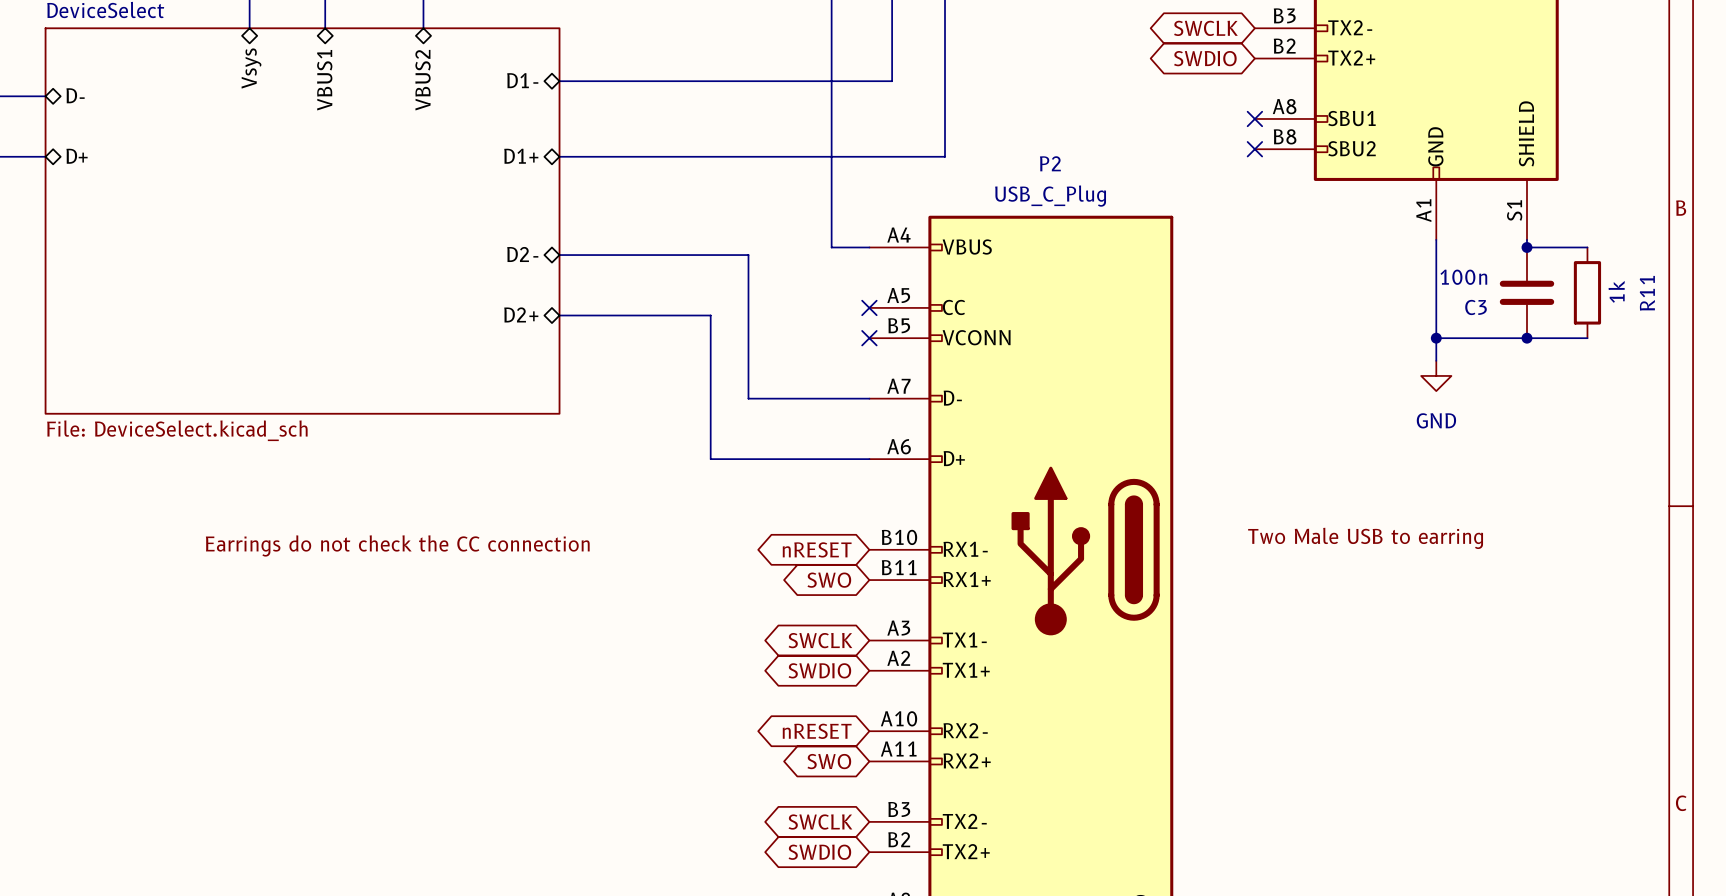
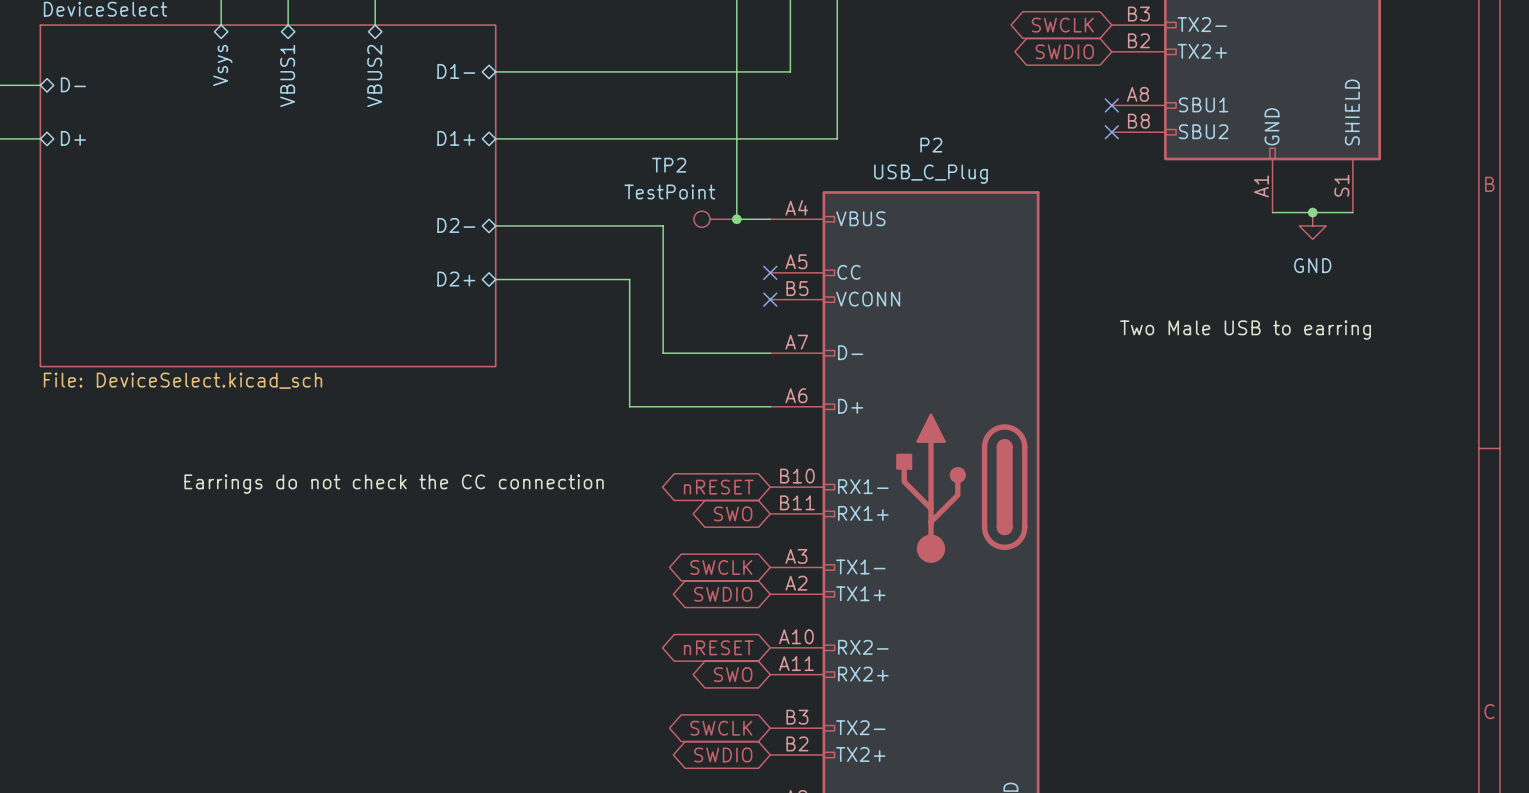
wire: (1436, 239) (1436, 360) -> (1272, 212) (1352, 212)
wire: (1527, 239) (1527, 247) (1587, 247) -> none
TP2: none -> TestPoint (715, 219)
junction: none -> (736, 219)
junction position: (1527, 247) -> (1312, 212)
C3: 100n (1527, 292) -> none
R11: 1k (1587, 292) -> none
wire: (1436, 338) (1587, 338) -> none
junction: (1436, 338) -> none
junction: (1527, 338) -> none
power symbol position: GND (1436, 375) -> GND (1312, 225)
label position: Two Male USB to earring (1365, 538) -> Two Male USB to earring (1245, 330)

